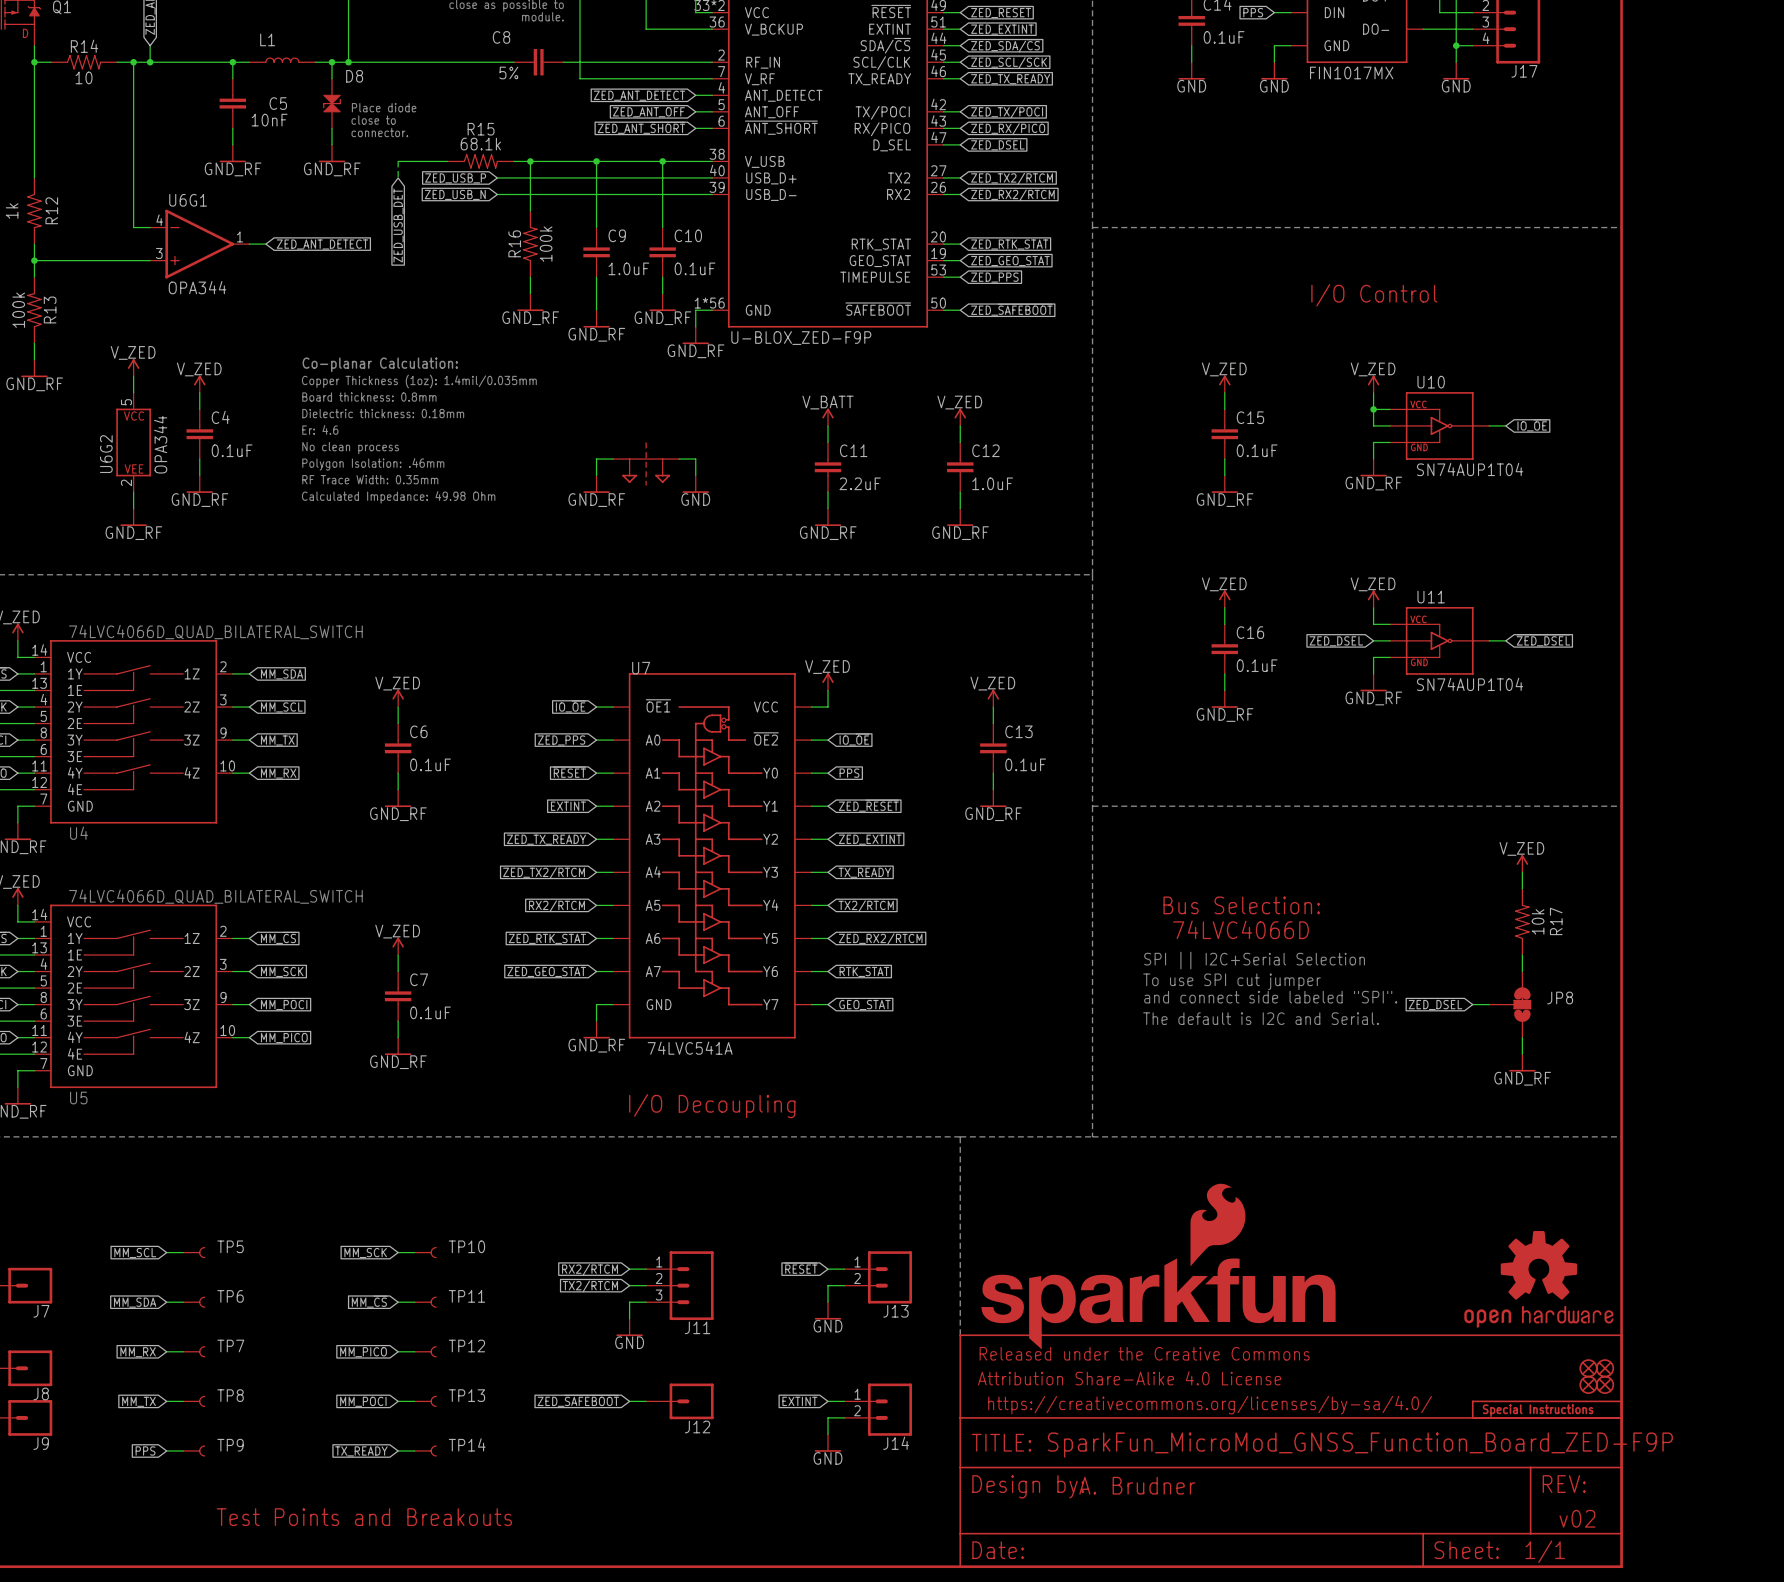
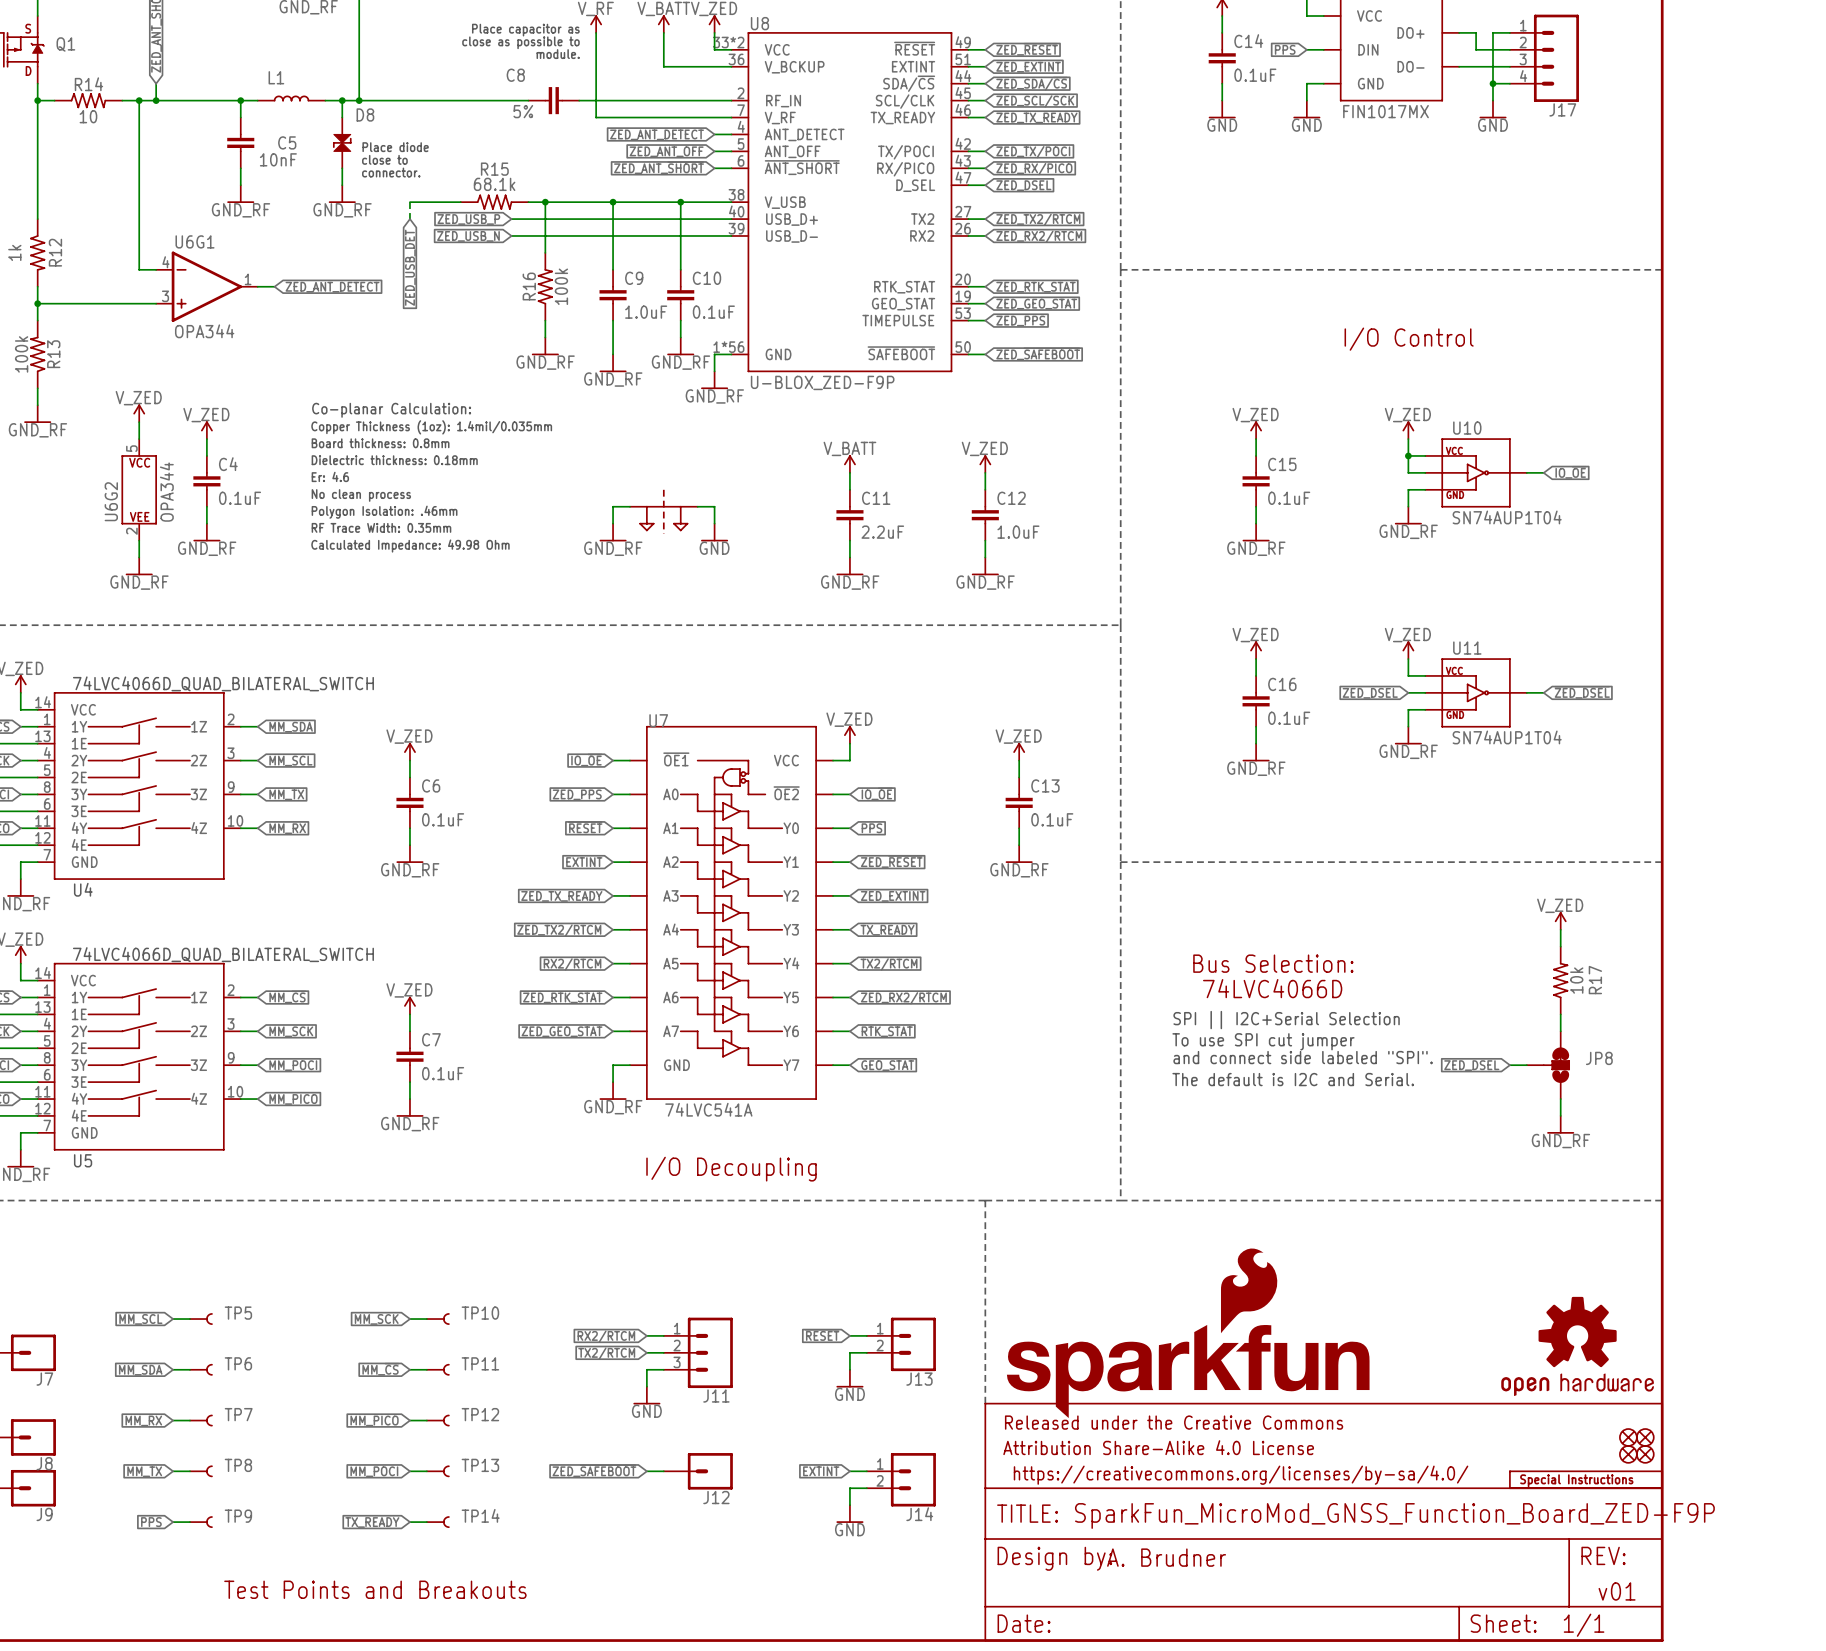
text: v02 (1577, 1518) -> v01 (1617, 1591)

